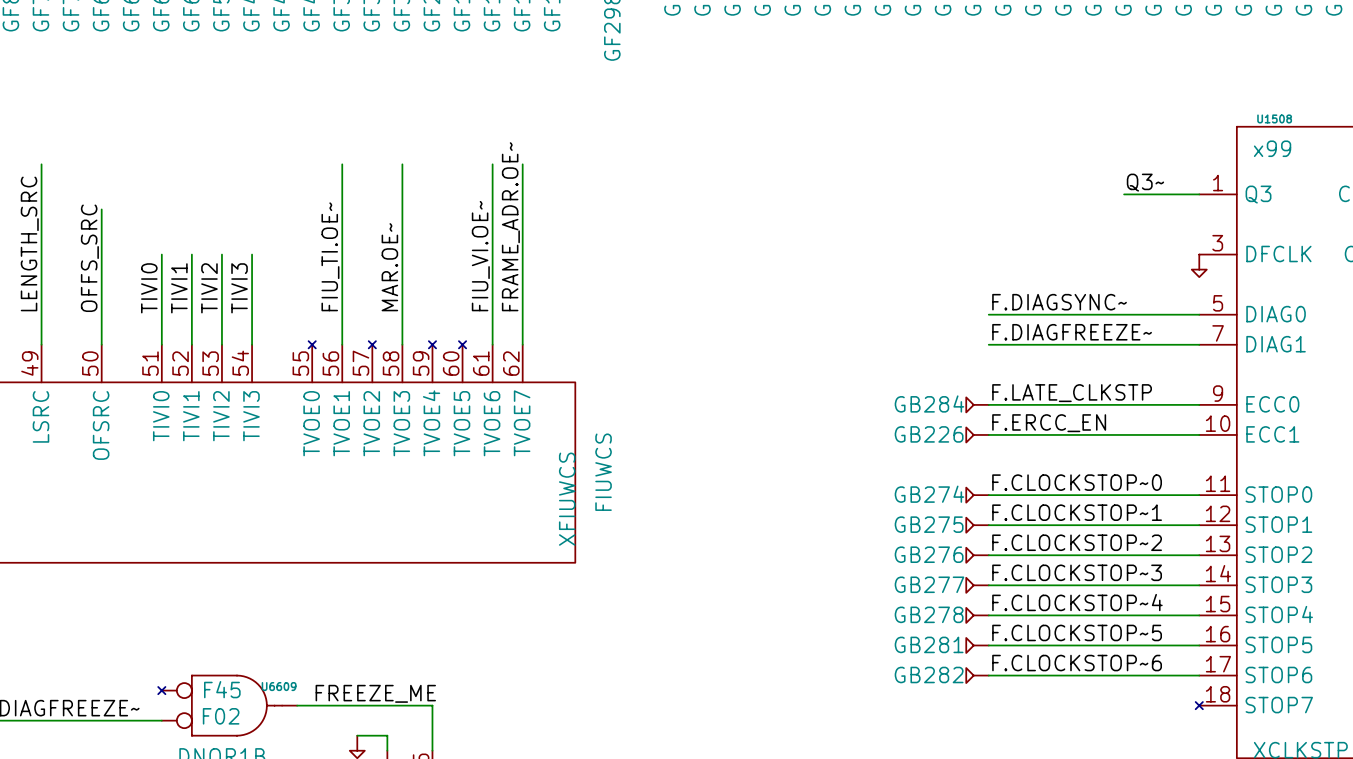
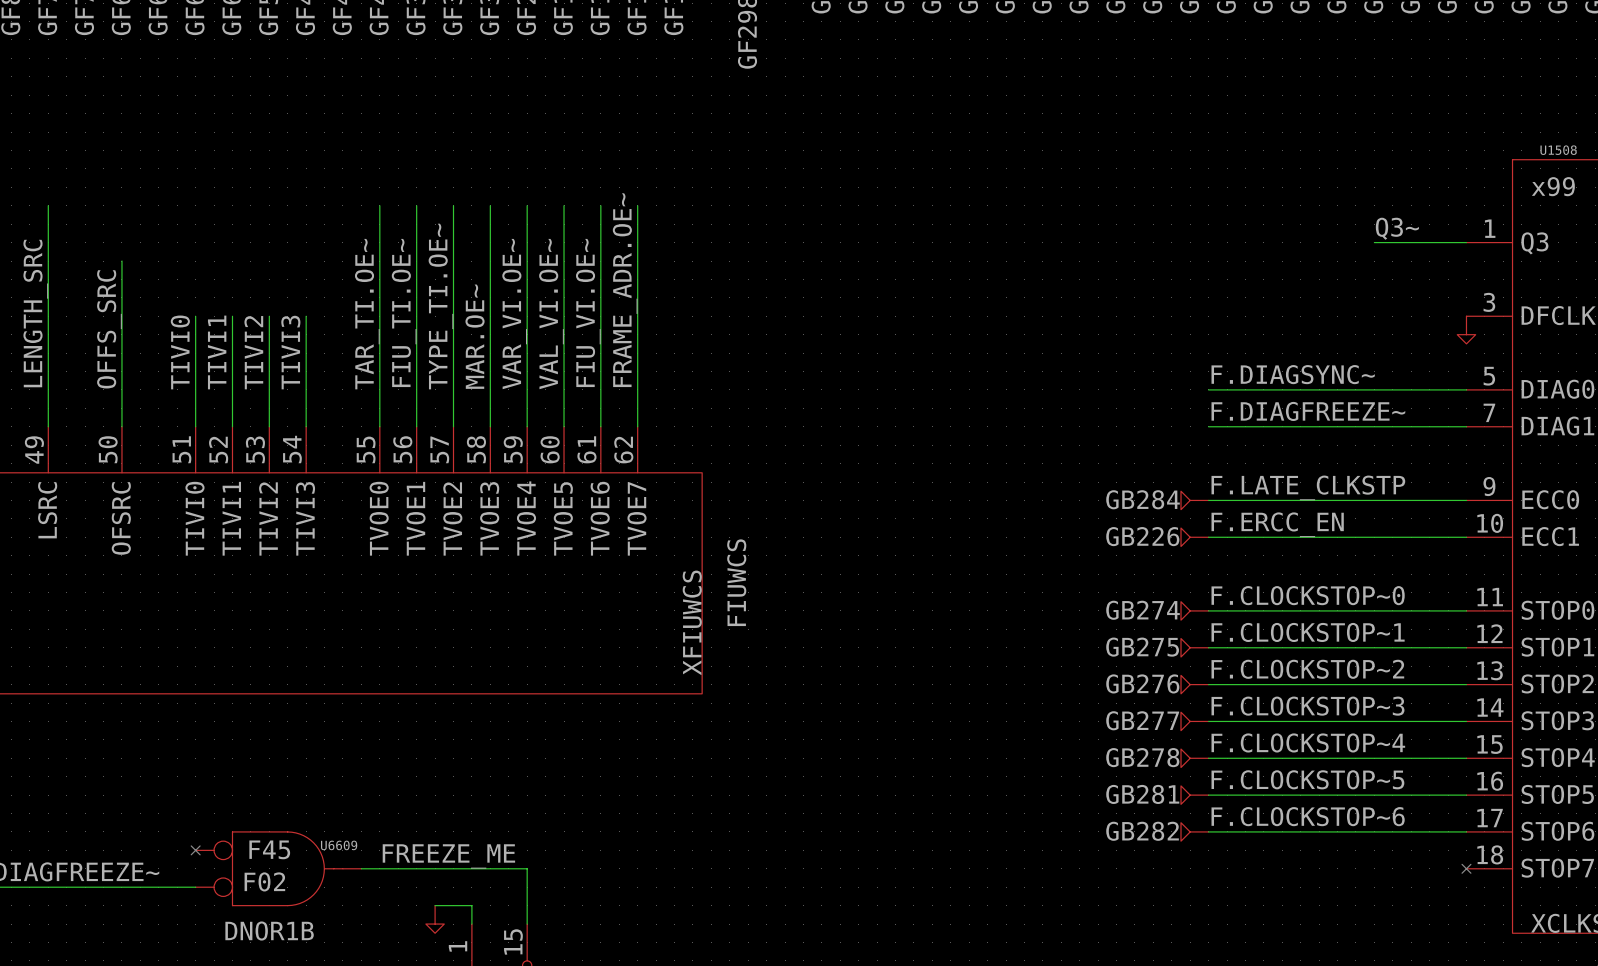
wire: none -> (379, 205) (379, 426)
wire: none -> (453, 205) (453, 426)
wire: none -> (527, 205) (527, 426)
wire: none -> (564, 205) (564, 426)
label: none -> TYPE_TI.OE~ (440, 306)
label: none -> VAR_VI.OE~ (514, 314)
label: none -> TAR_TI.OE~ (367, 314)
label: none -> VAL_VI.OE~ (551, 314)
no-connect mark: (312, 344) -> none
no-connect mark: (372, 344) -> none
no-connect mark: (432, 344) -> none
no-connect mark: (462, 344) -> none

